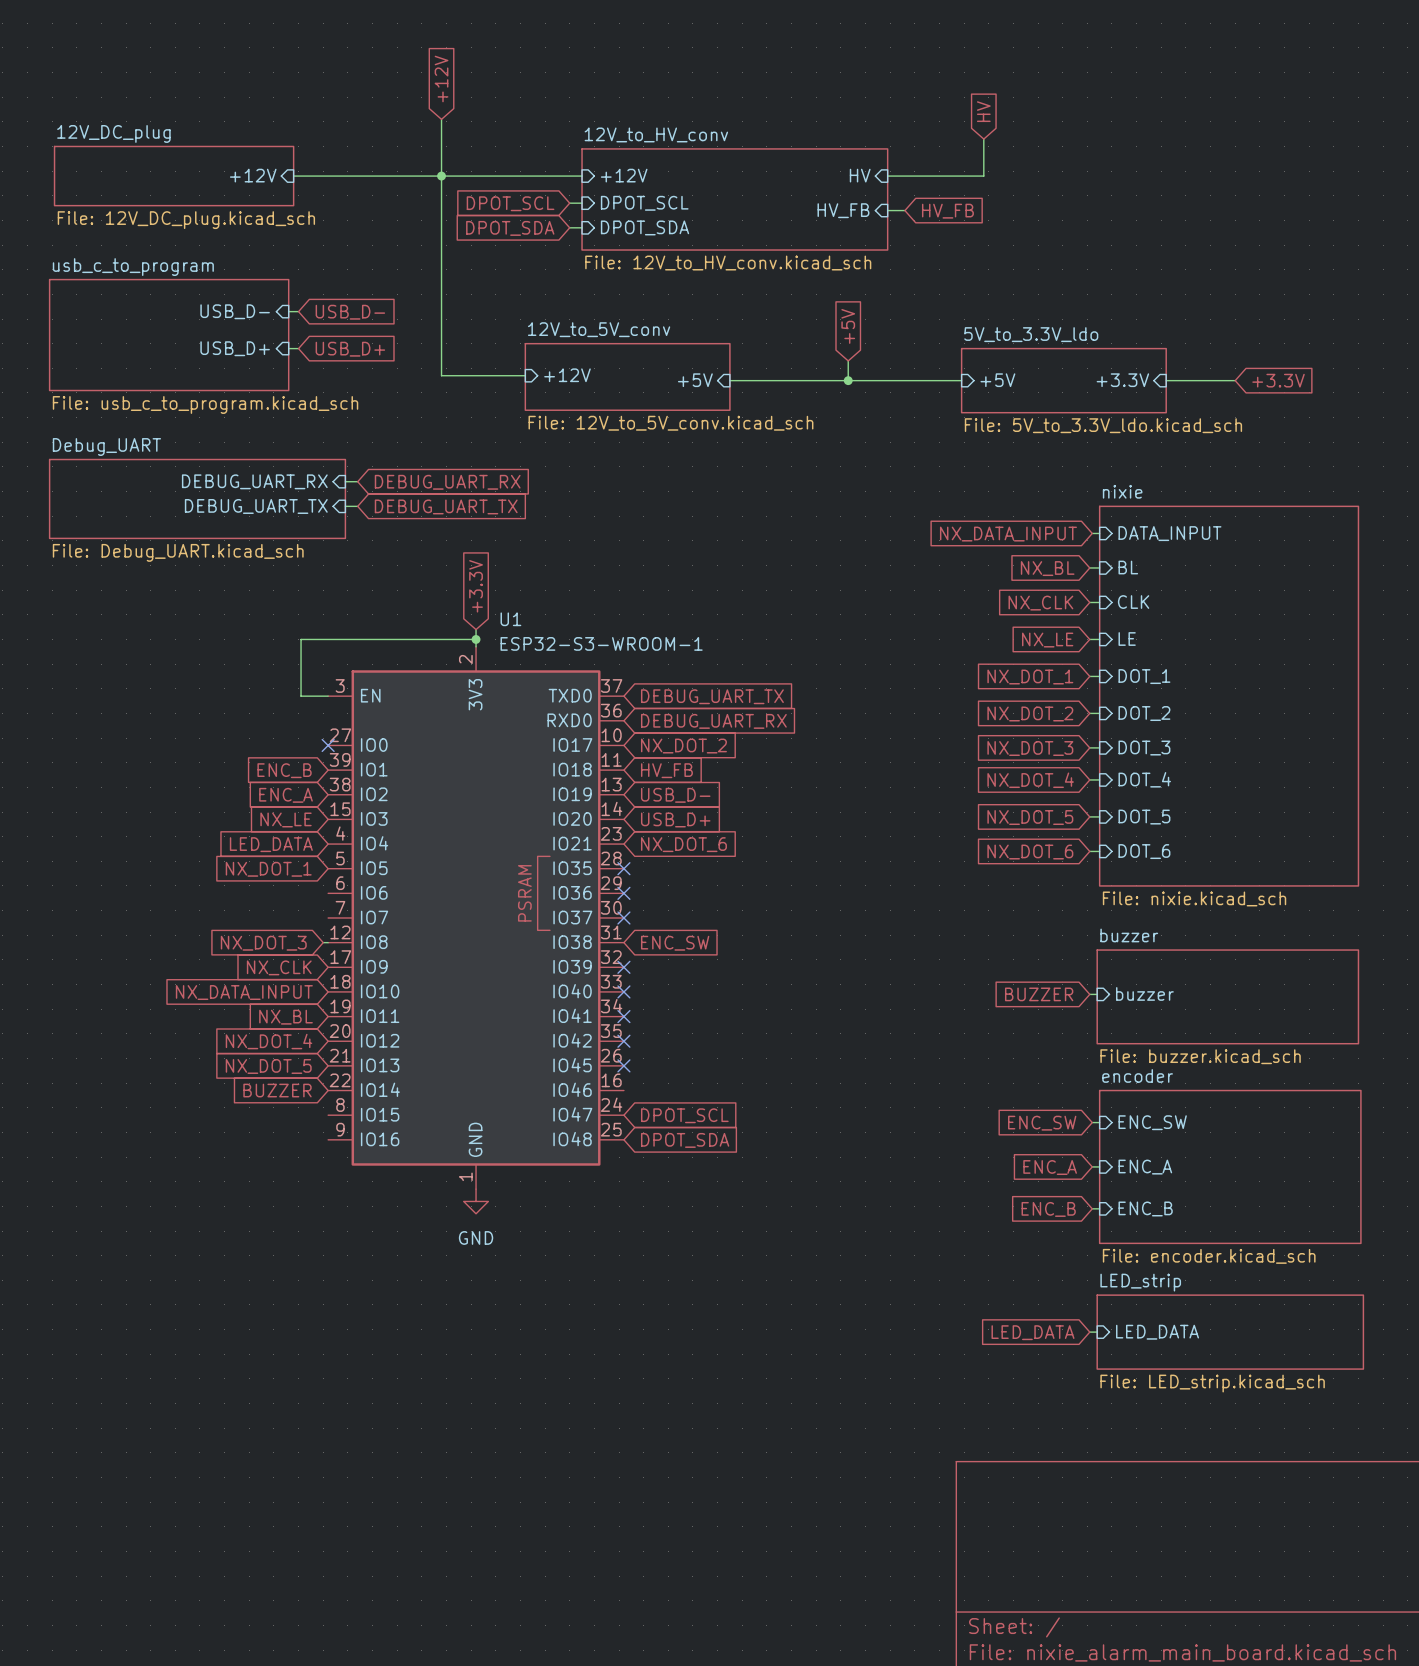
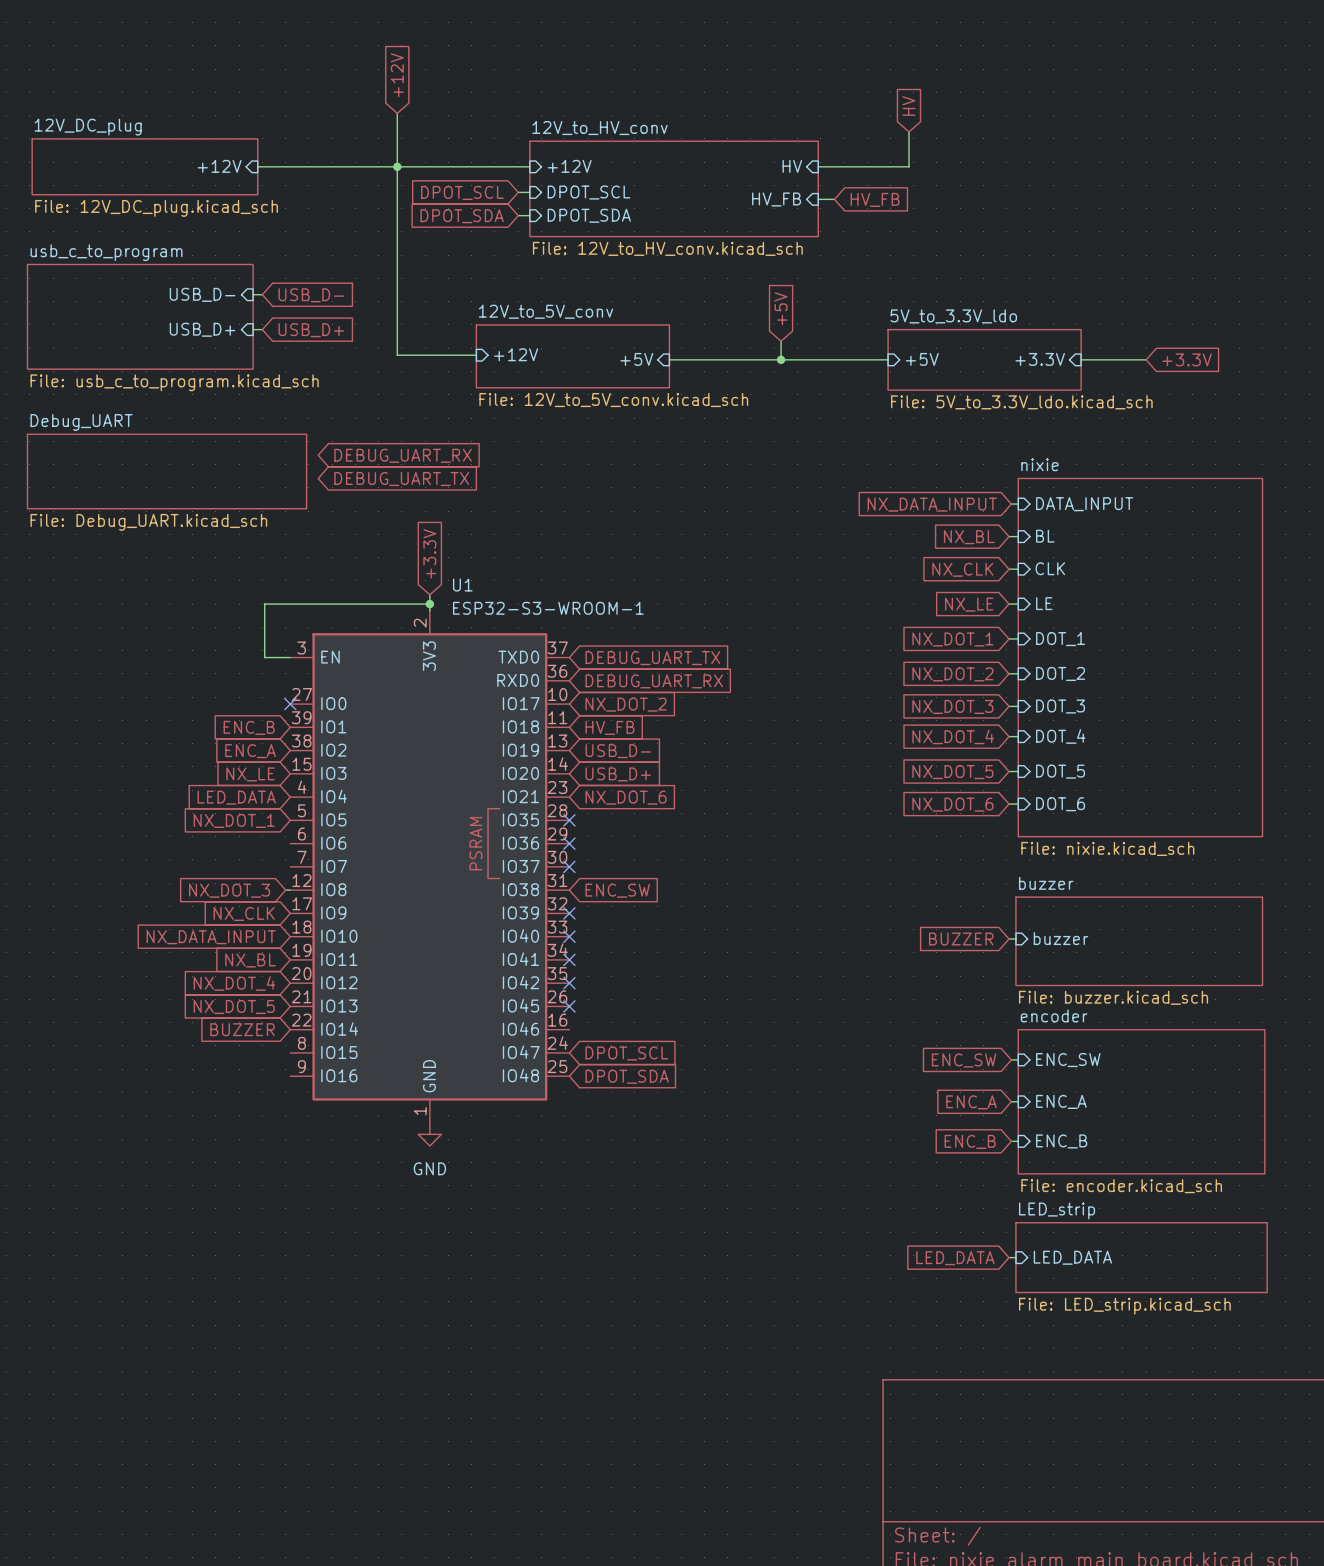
sheet pin: DEBUG_UART_RX (254, 481) -> none
wire: (345, 481) (357, 481) -> none
sheet pin: DEBUG_UART_TX (256, 506) -> none
wire: (345, 506) (357, 506) -> none

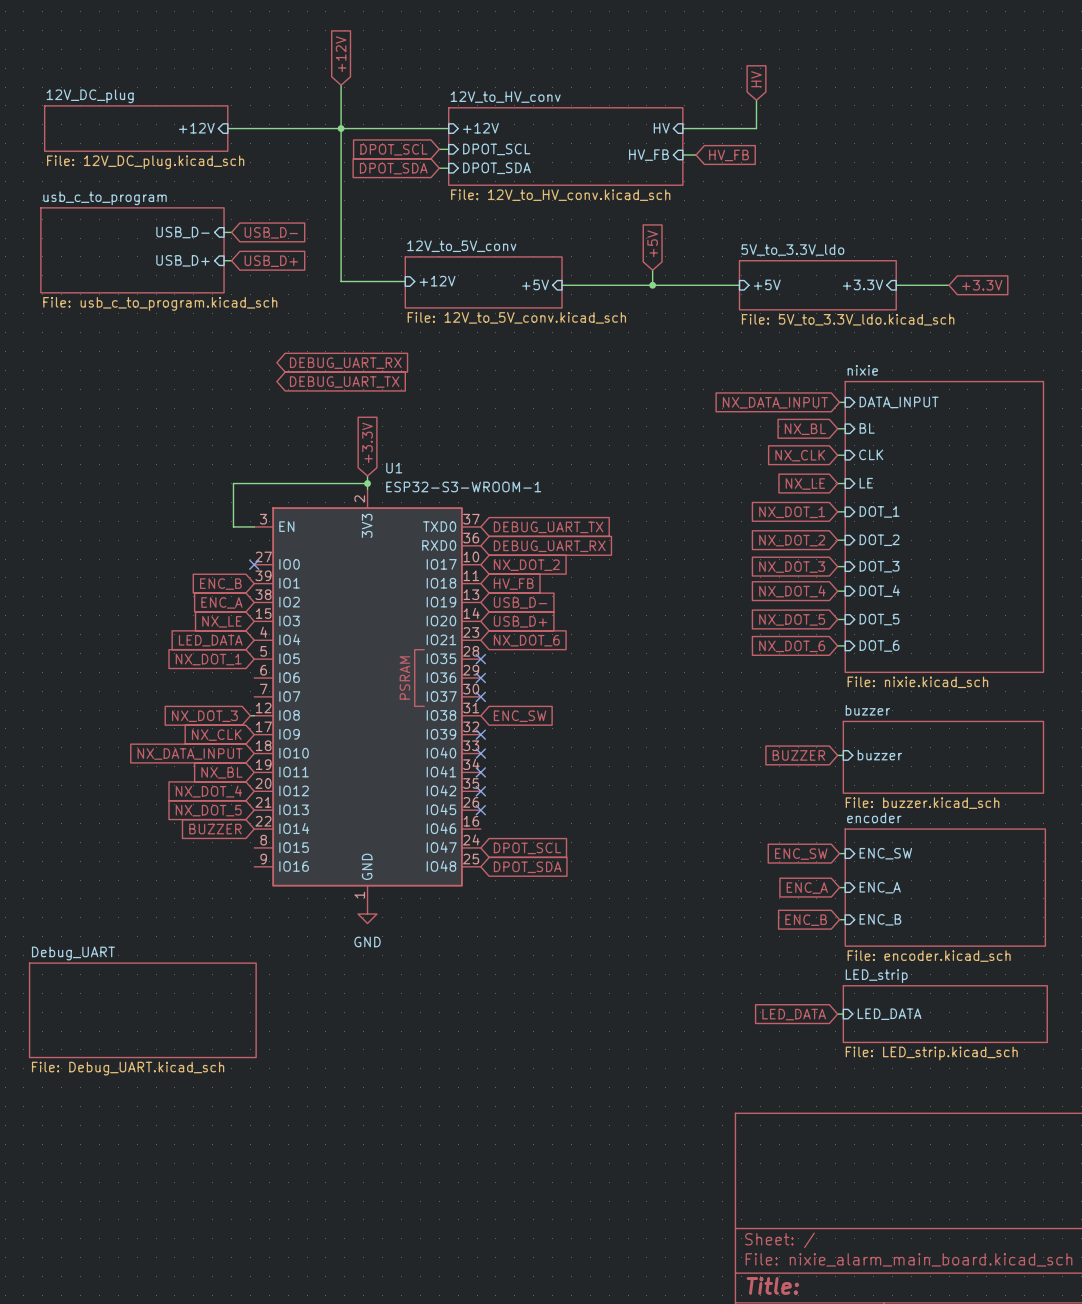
sheet Debug_UART: File: Debug_UART.kicad_sch (167, 471) -> none
sheet Debug_UART: none -> File: Debug_UART.kicad_sch (142, 1010)

